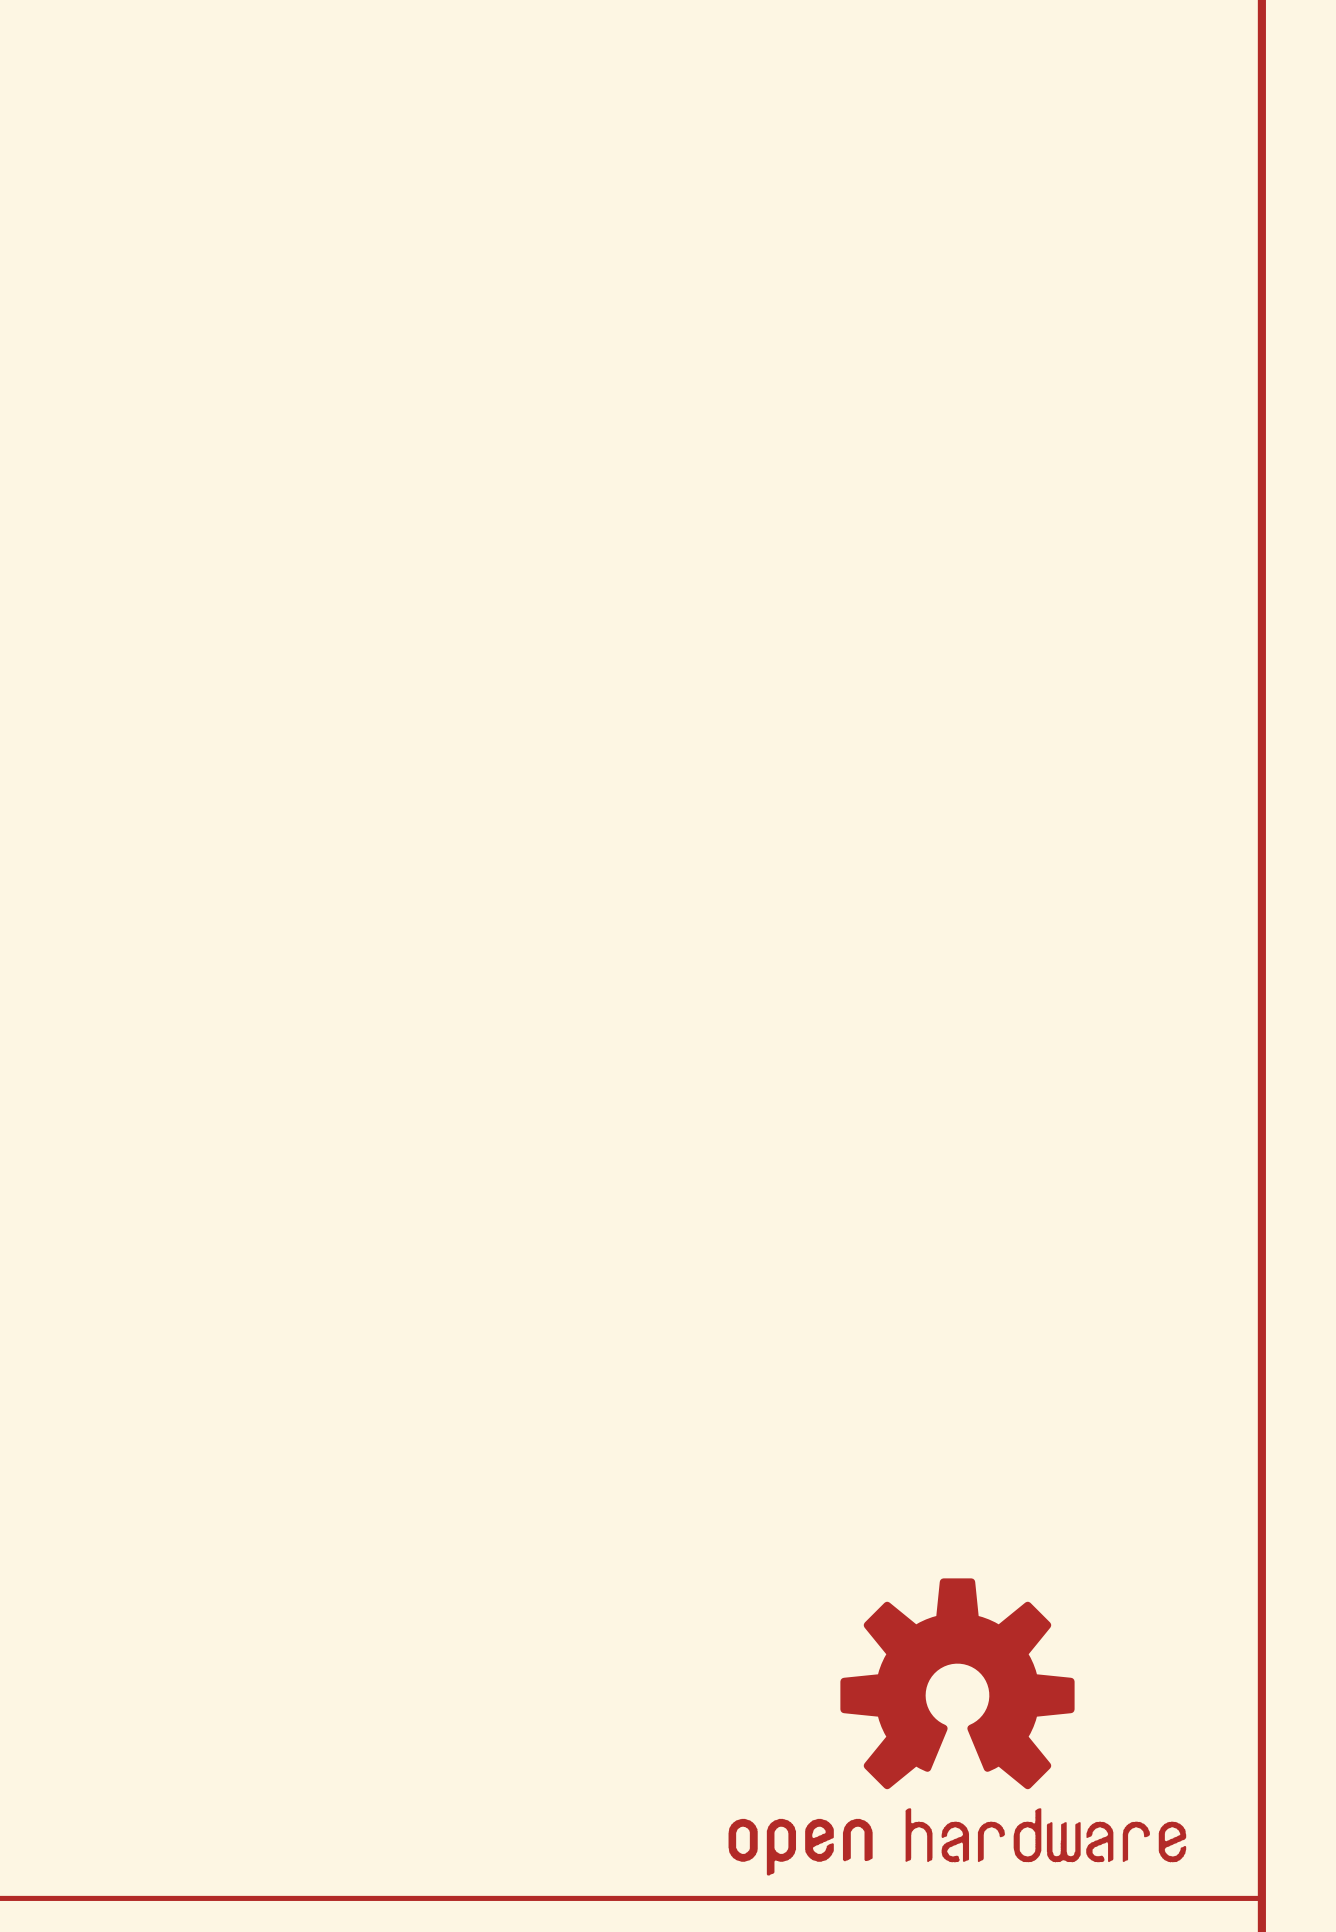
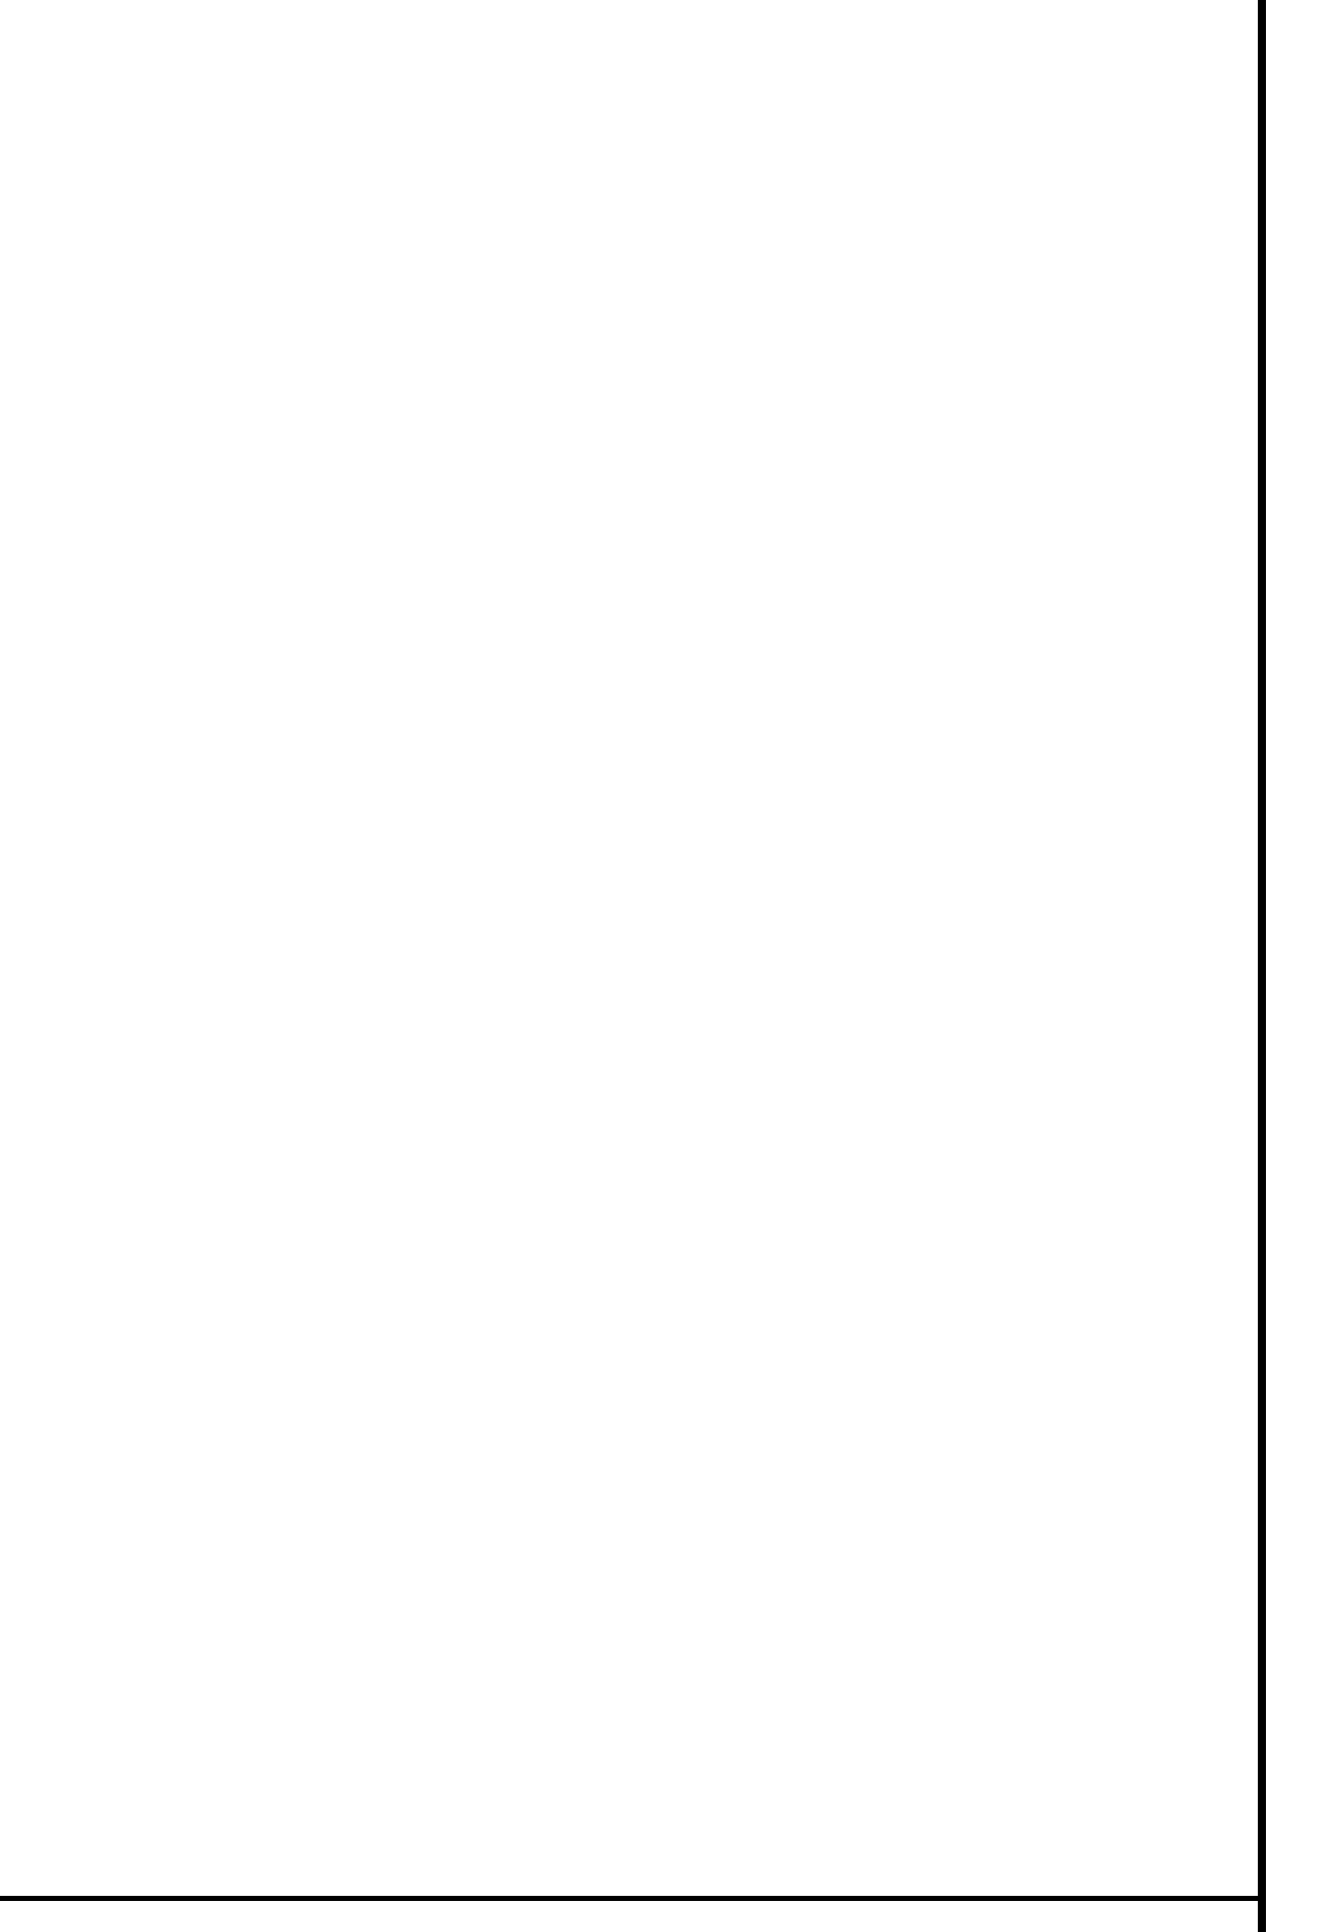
part: (957, 1726) -> none

